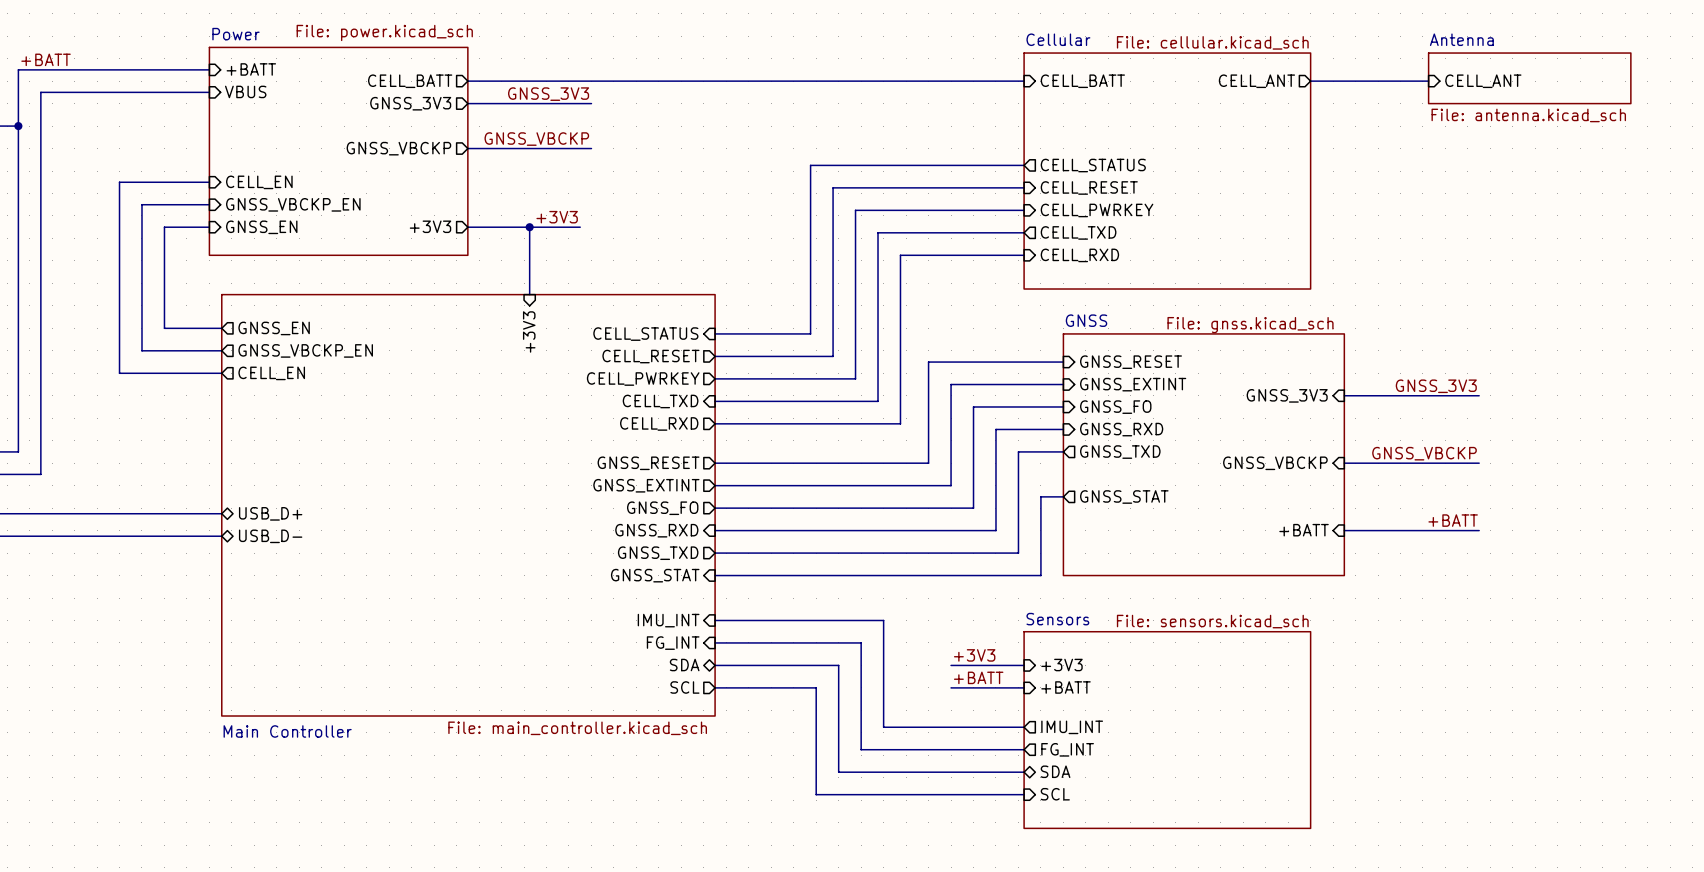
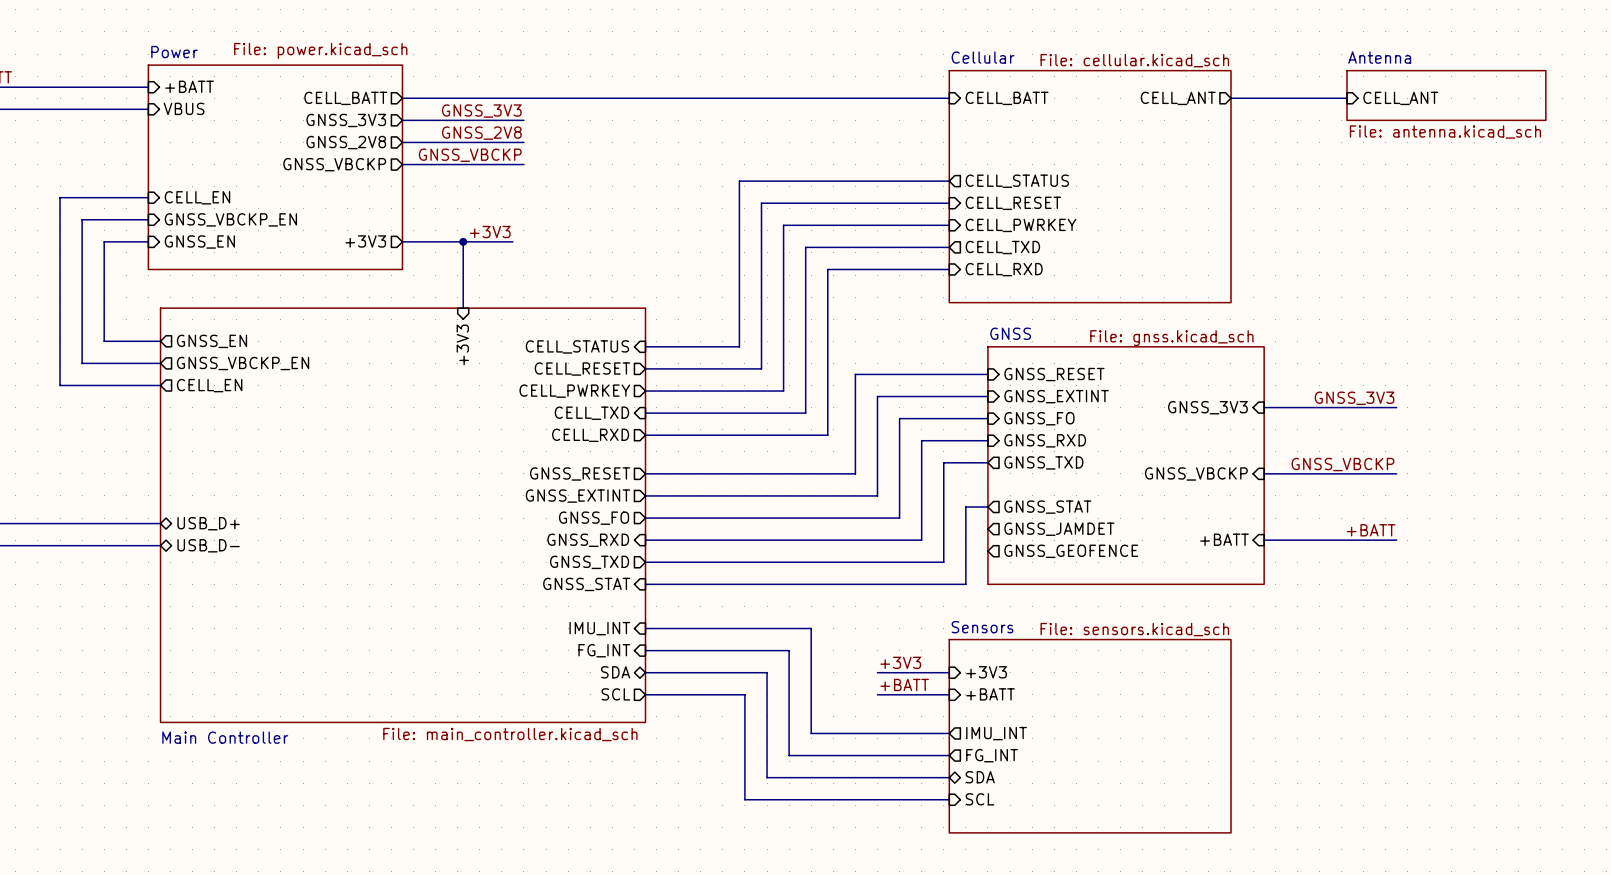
label: none -> GNSS_2V8 (481, 133)
sheet pin: none -> GNSS_2V8 (346, 142)
wire: none -> (402, 142) (523, 142)
sheet pin: none -> GNSS_JAMDET (1059, 529)
sheet pin: none -> GNSS_GEOFENCE (1071, 551)

